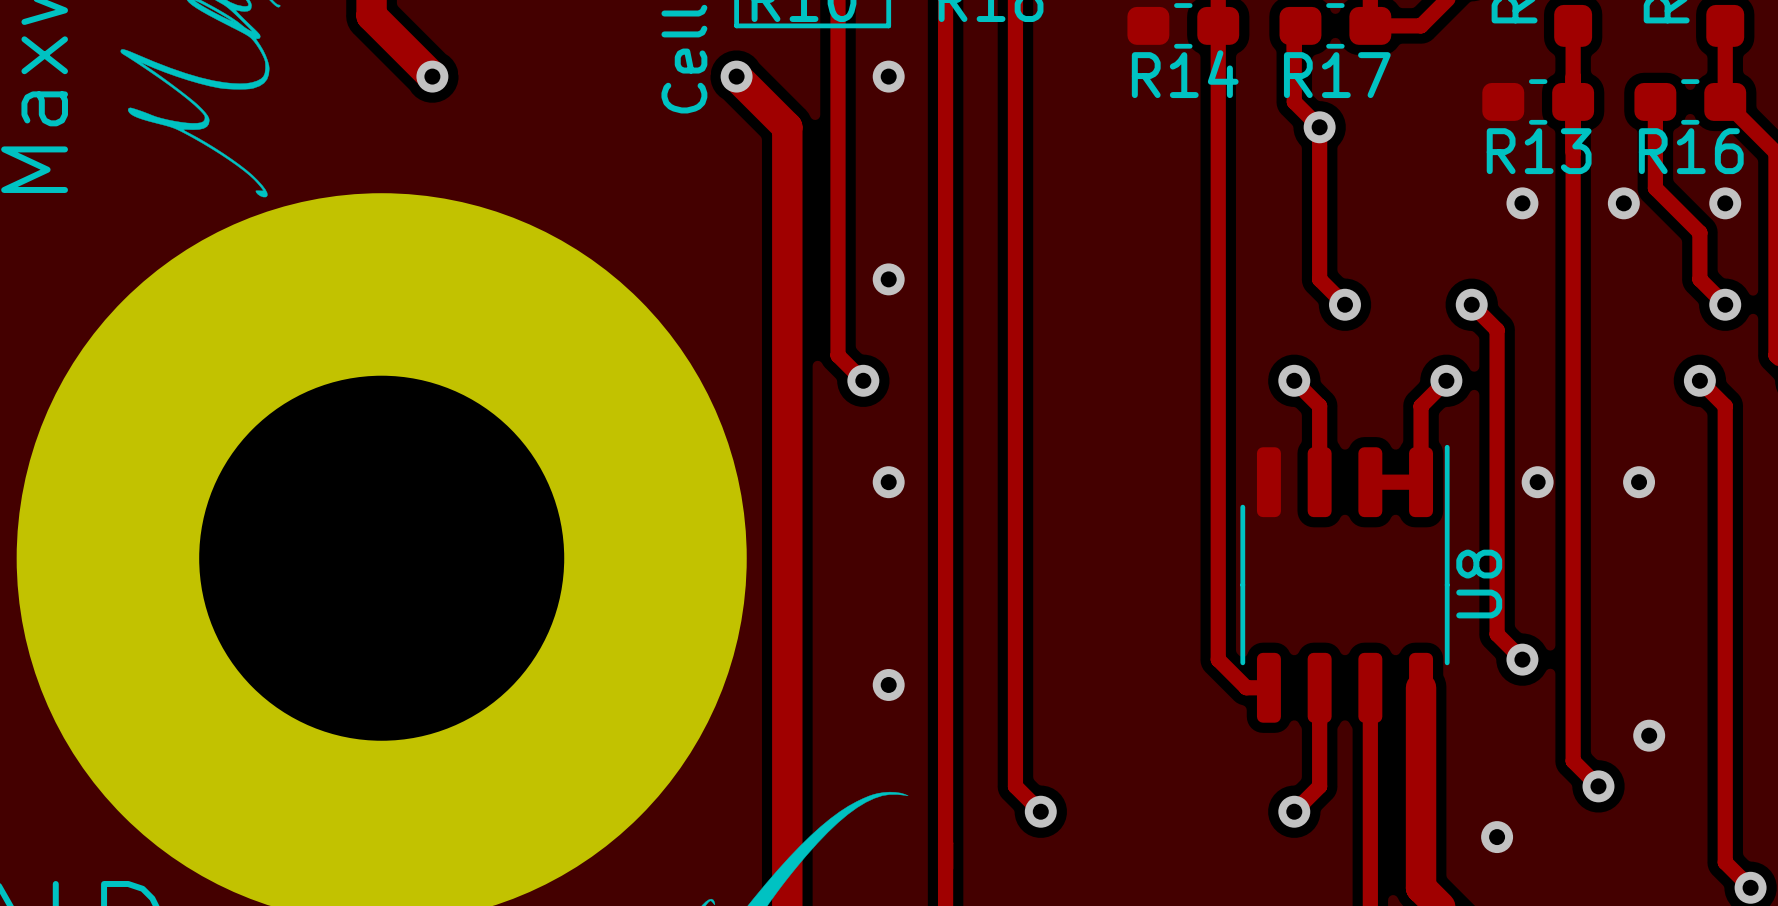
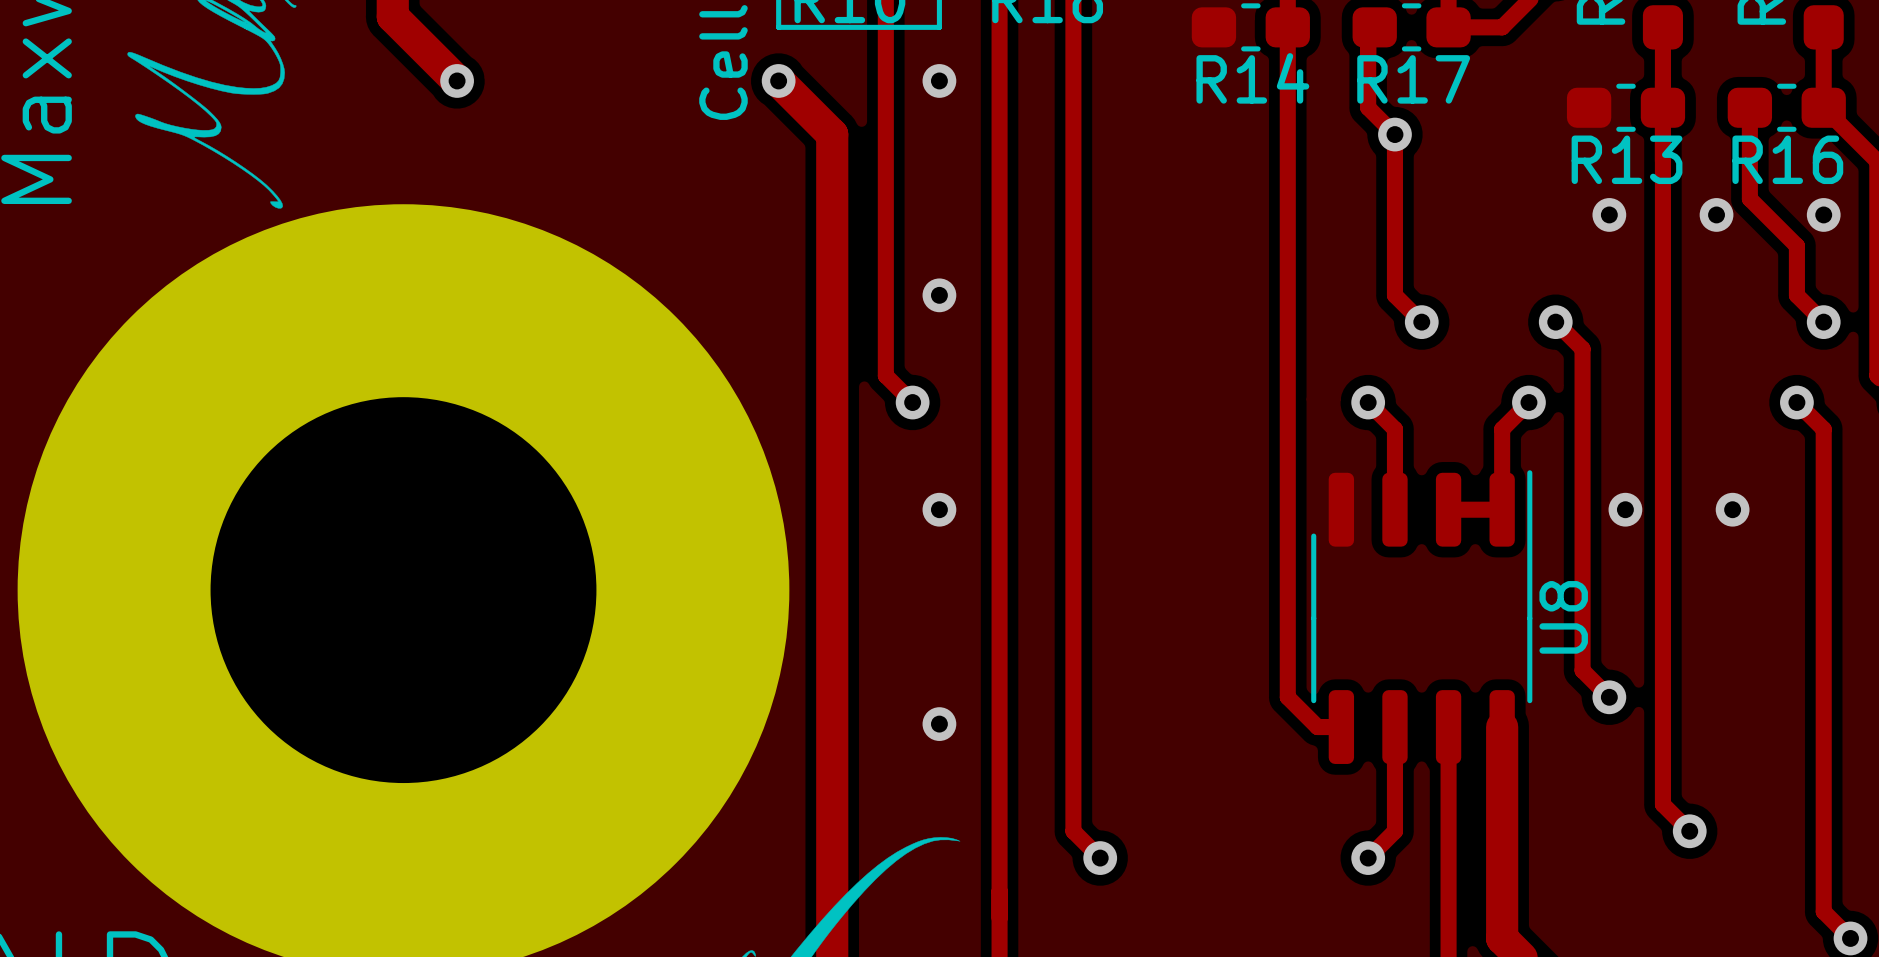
via: (1649, 735) -> none
via: (1497, 837) -> none

